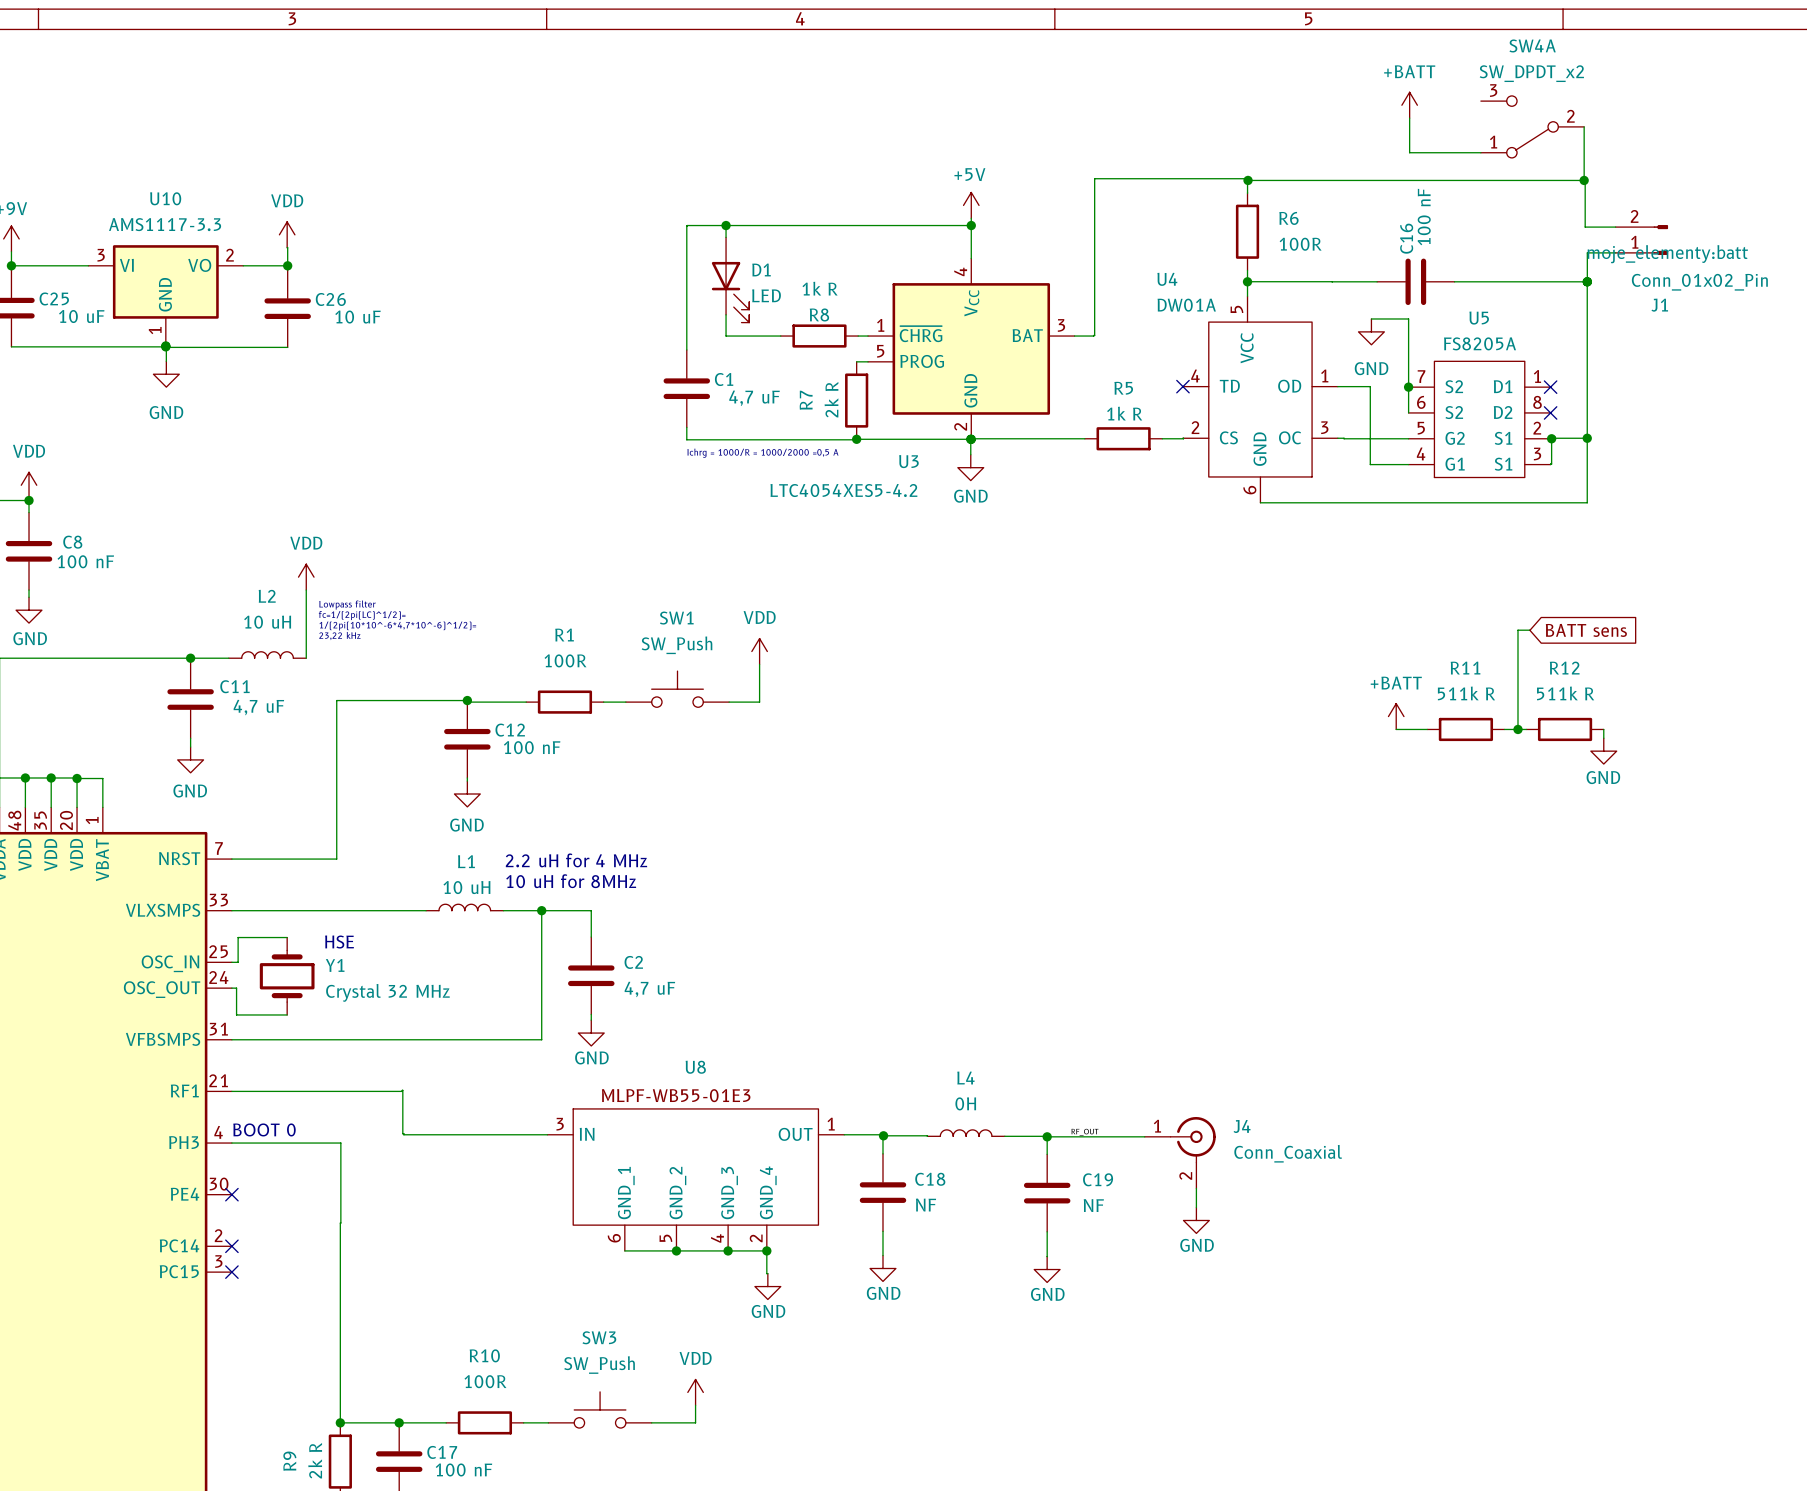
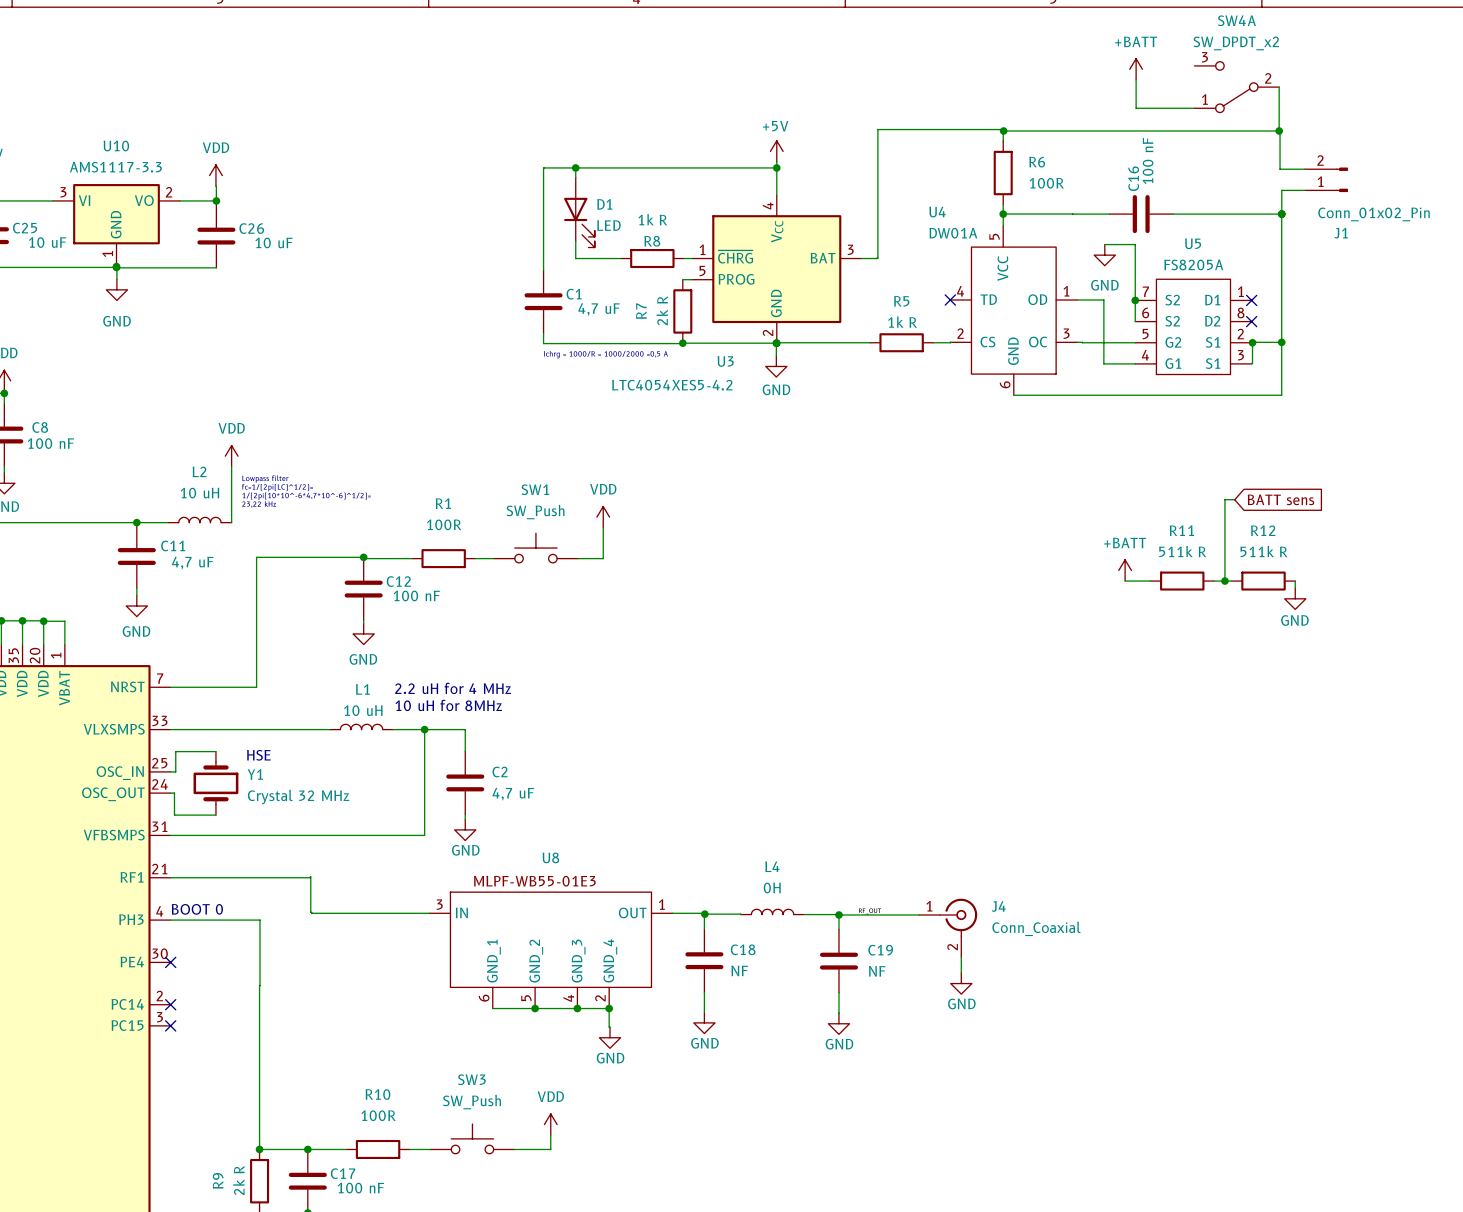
J1 text: moje_elementy:batt (1667, 254) -> none

